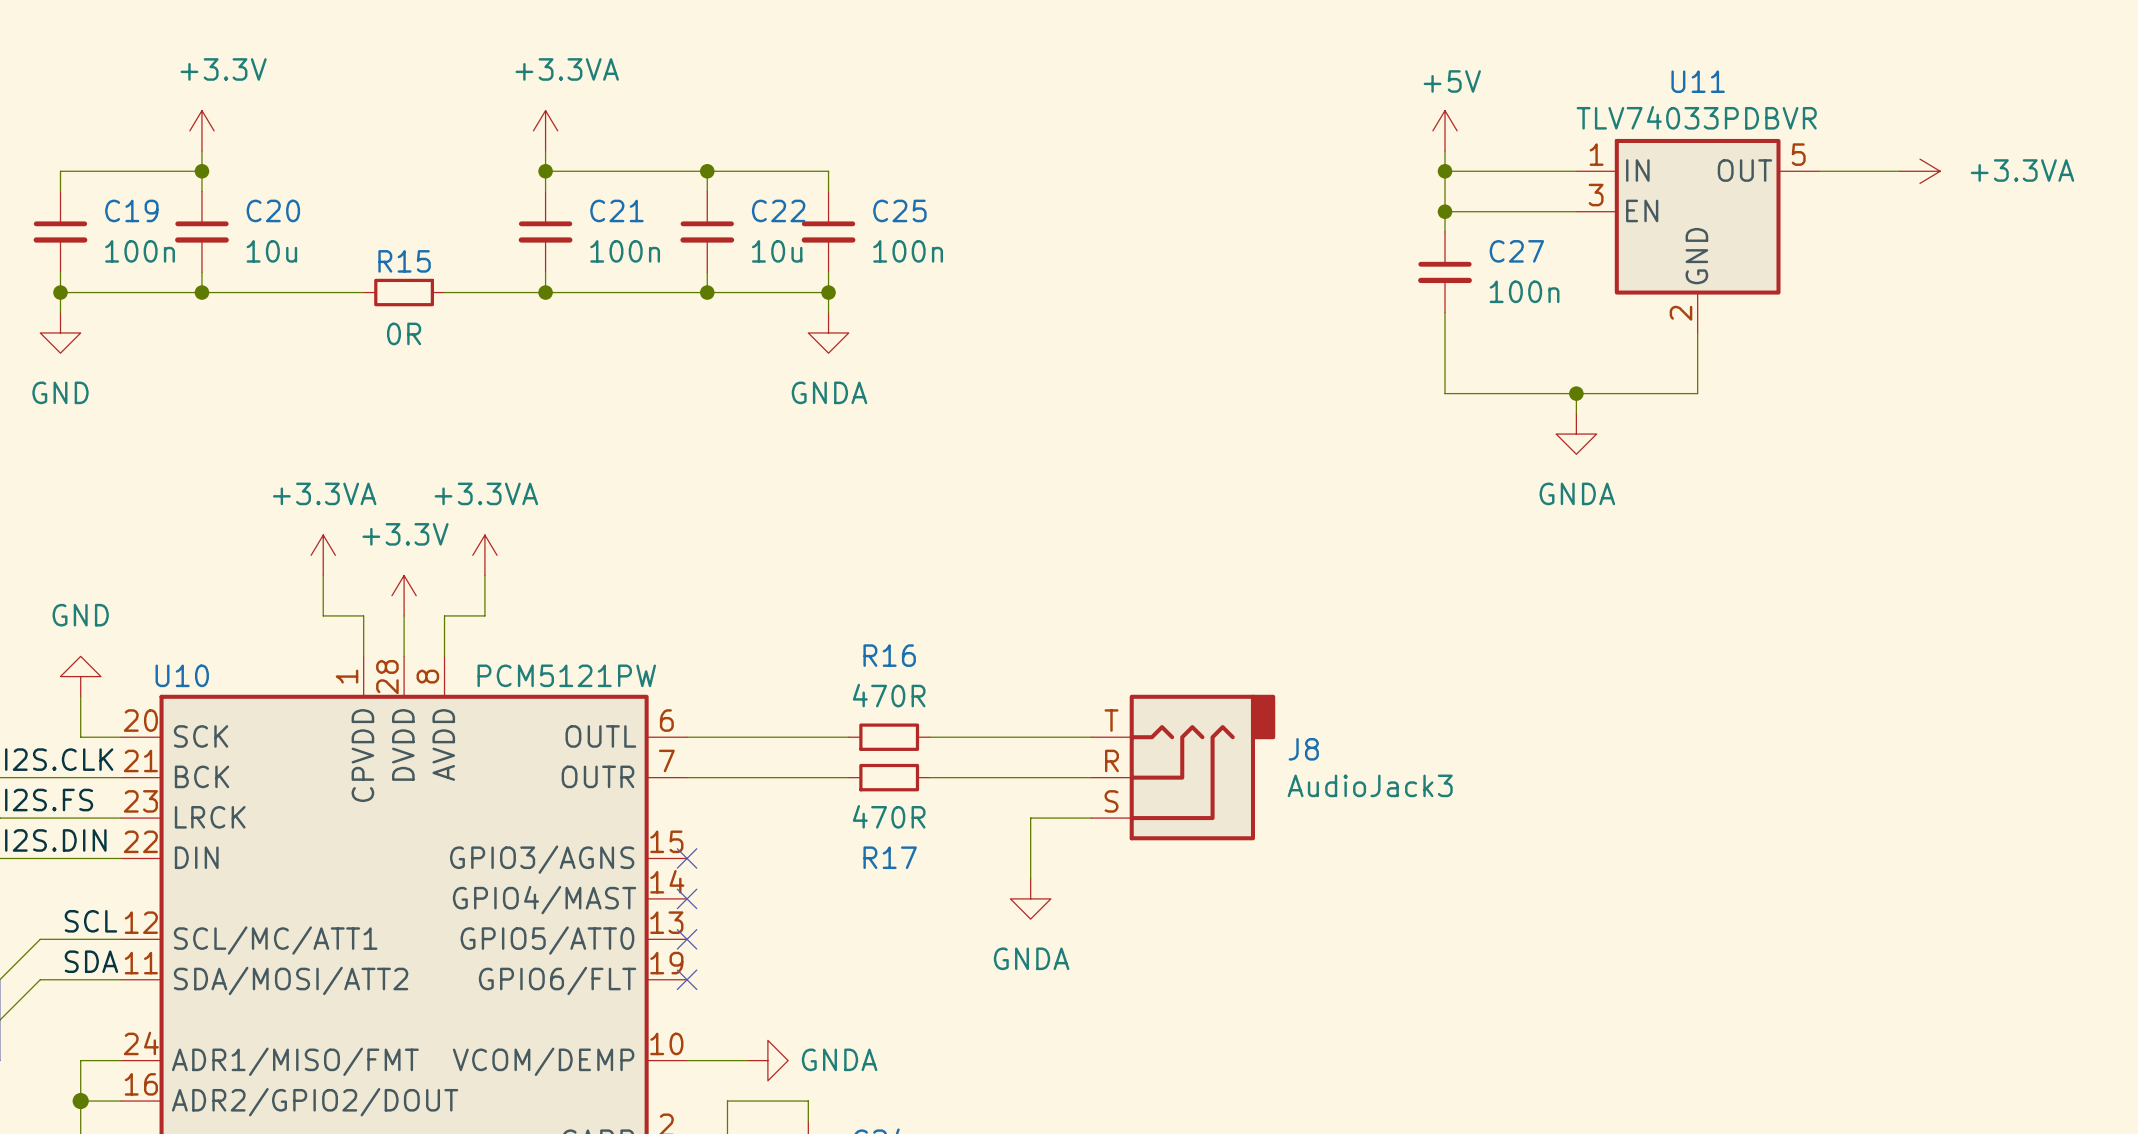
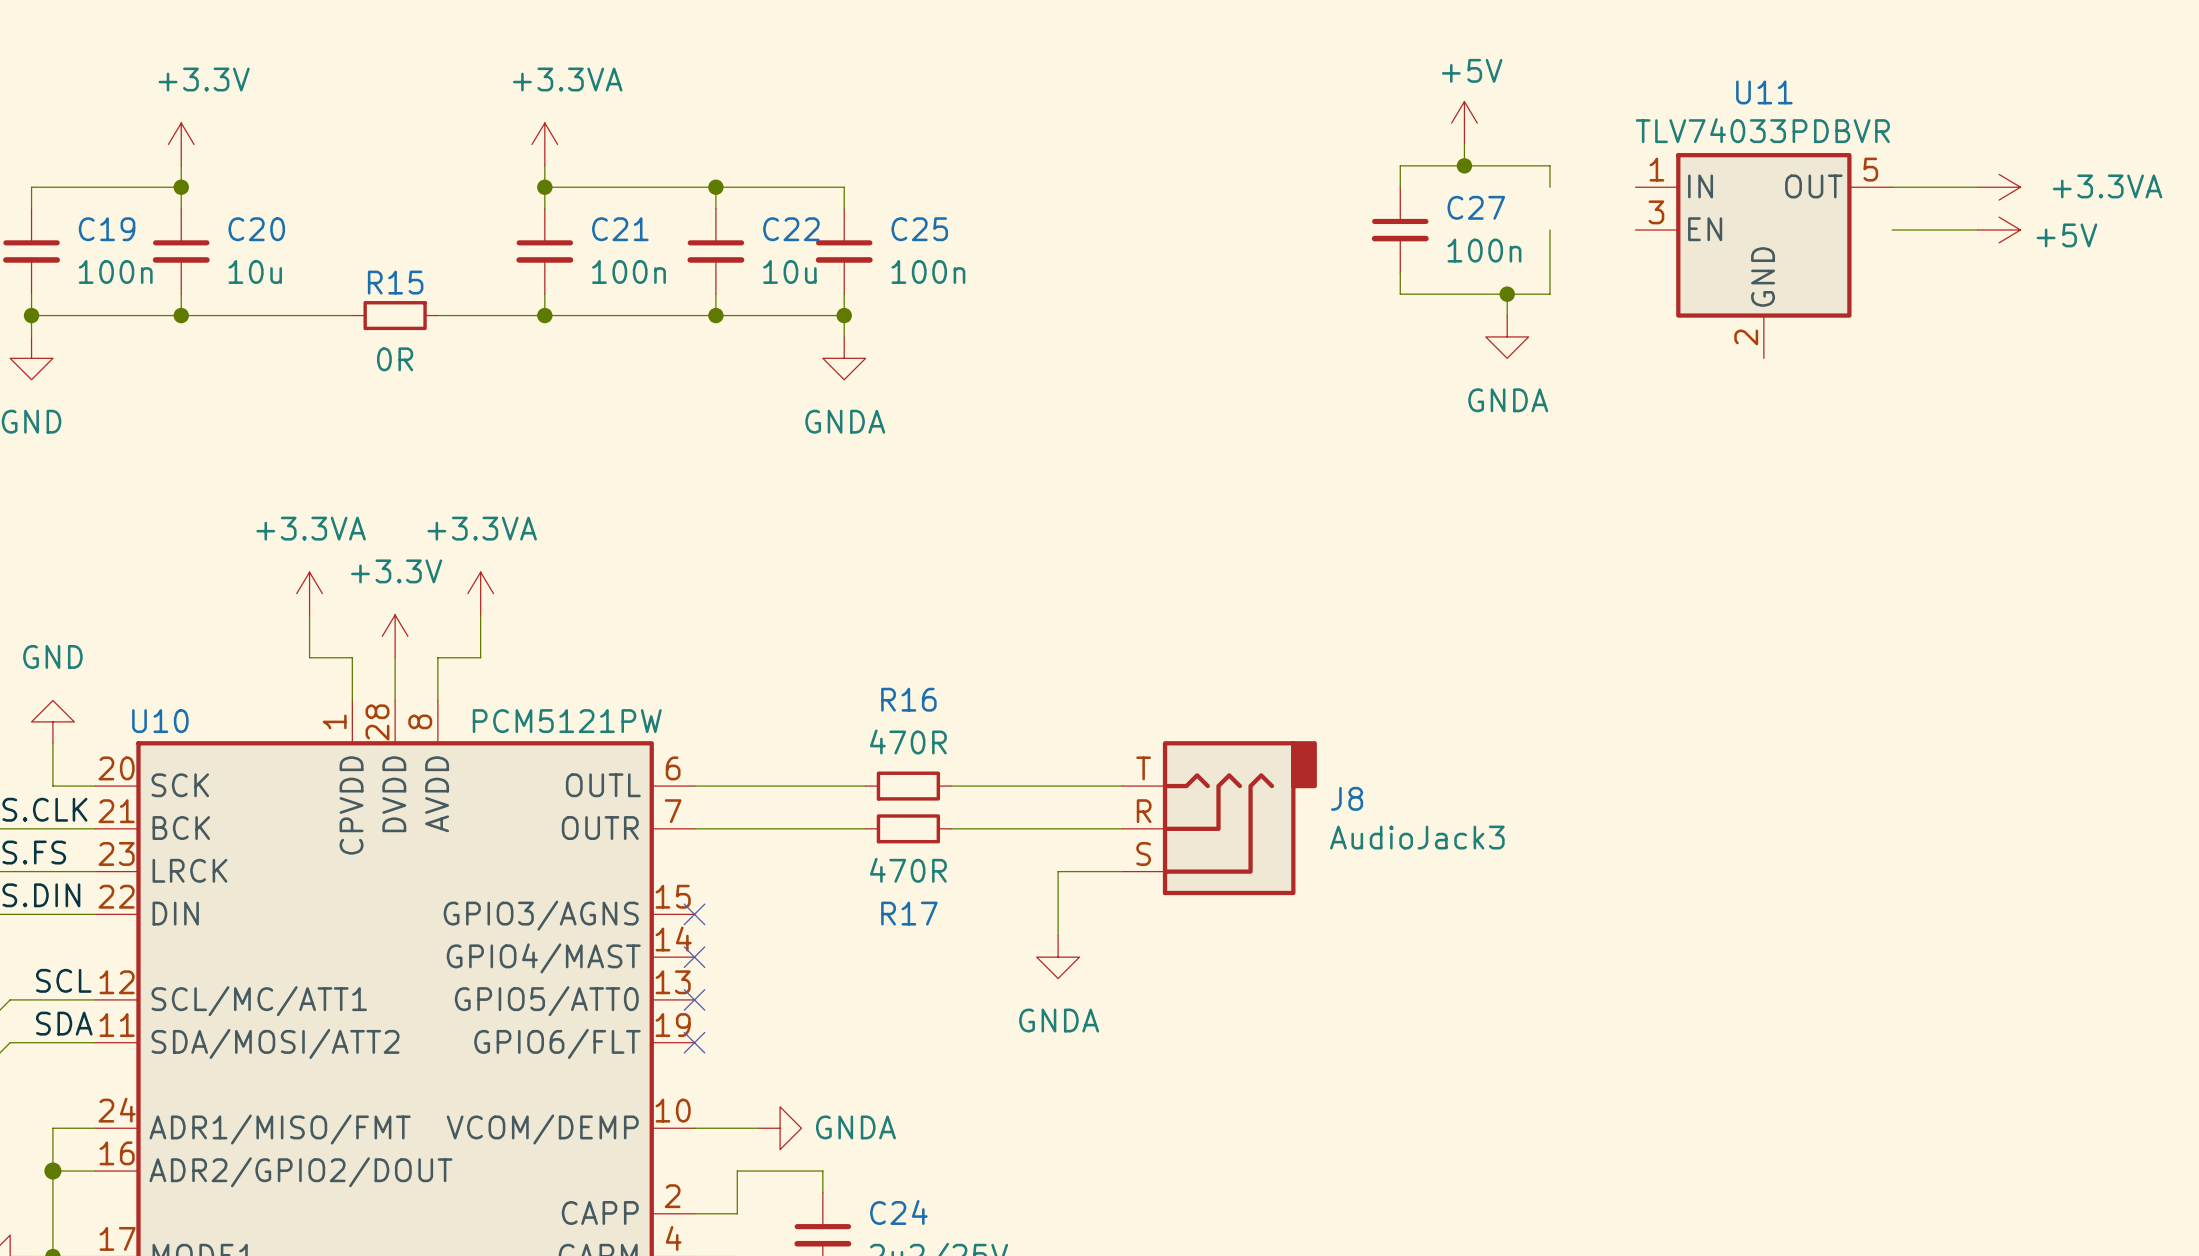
wire: none -> (1464, 144) (1464, 165)
power symbol position: +5V (1445, 130) -> +5V (1464, 123)
junction: none -> (1464, 165)
wire: (1445, 151) (1445, 231) -> none
wire: none -> (1400, 187) (1400, 165) (1549, 165) (1549, 187)
wire: (1445, 171) (1576, 171) -> none
junction: (1445, 171) -> none
wire: (1445, 211) (1576, 211) -> none
junction: (1445, 211) -> none
wire: none -> (1549, 230) (1549, 294) (1400, 294) (1400, 272)
wire: none -> (1892, 230) (1977, 230)
power symbol: none -> +5V (1999, 230)
C27 position: (1445, 272) -> (1400, 230)
junction: none -> (1507, 294)
wire: (1445, 312) (1445, 393) (1697, 393) (1697, 332) -> none
wire: (1576, 393) (1576, 413) -> (1507, 294) (1507, 315)
junction: (1576, 393) -> none
power symbol position: GNDA (1576, 434) -> GNDA (1507, 336)

